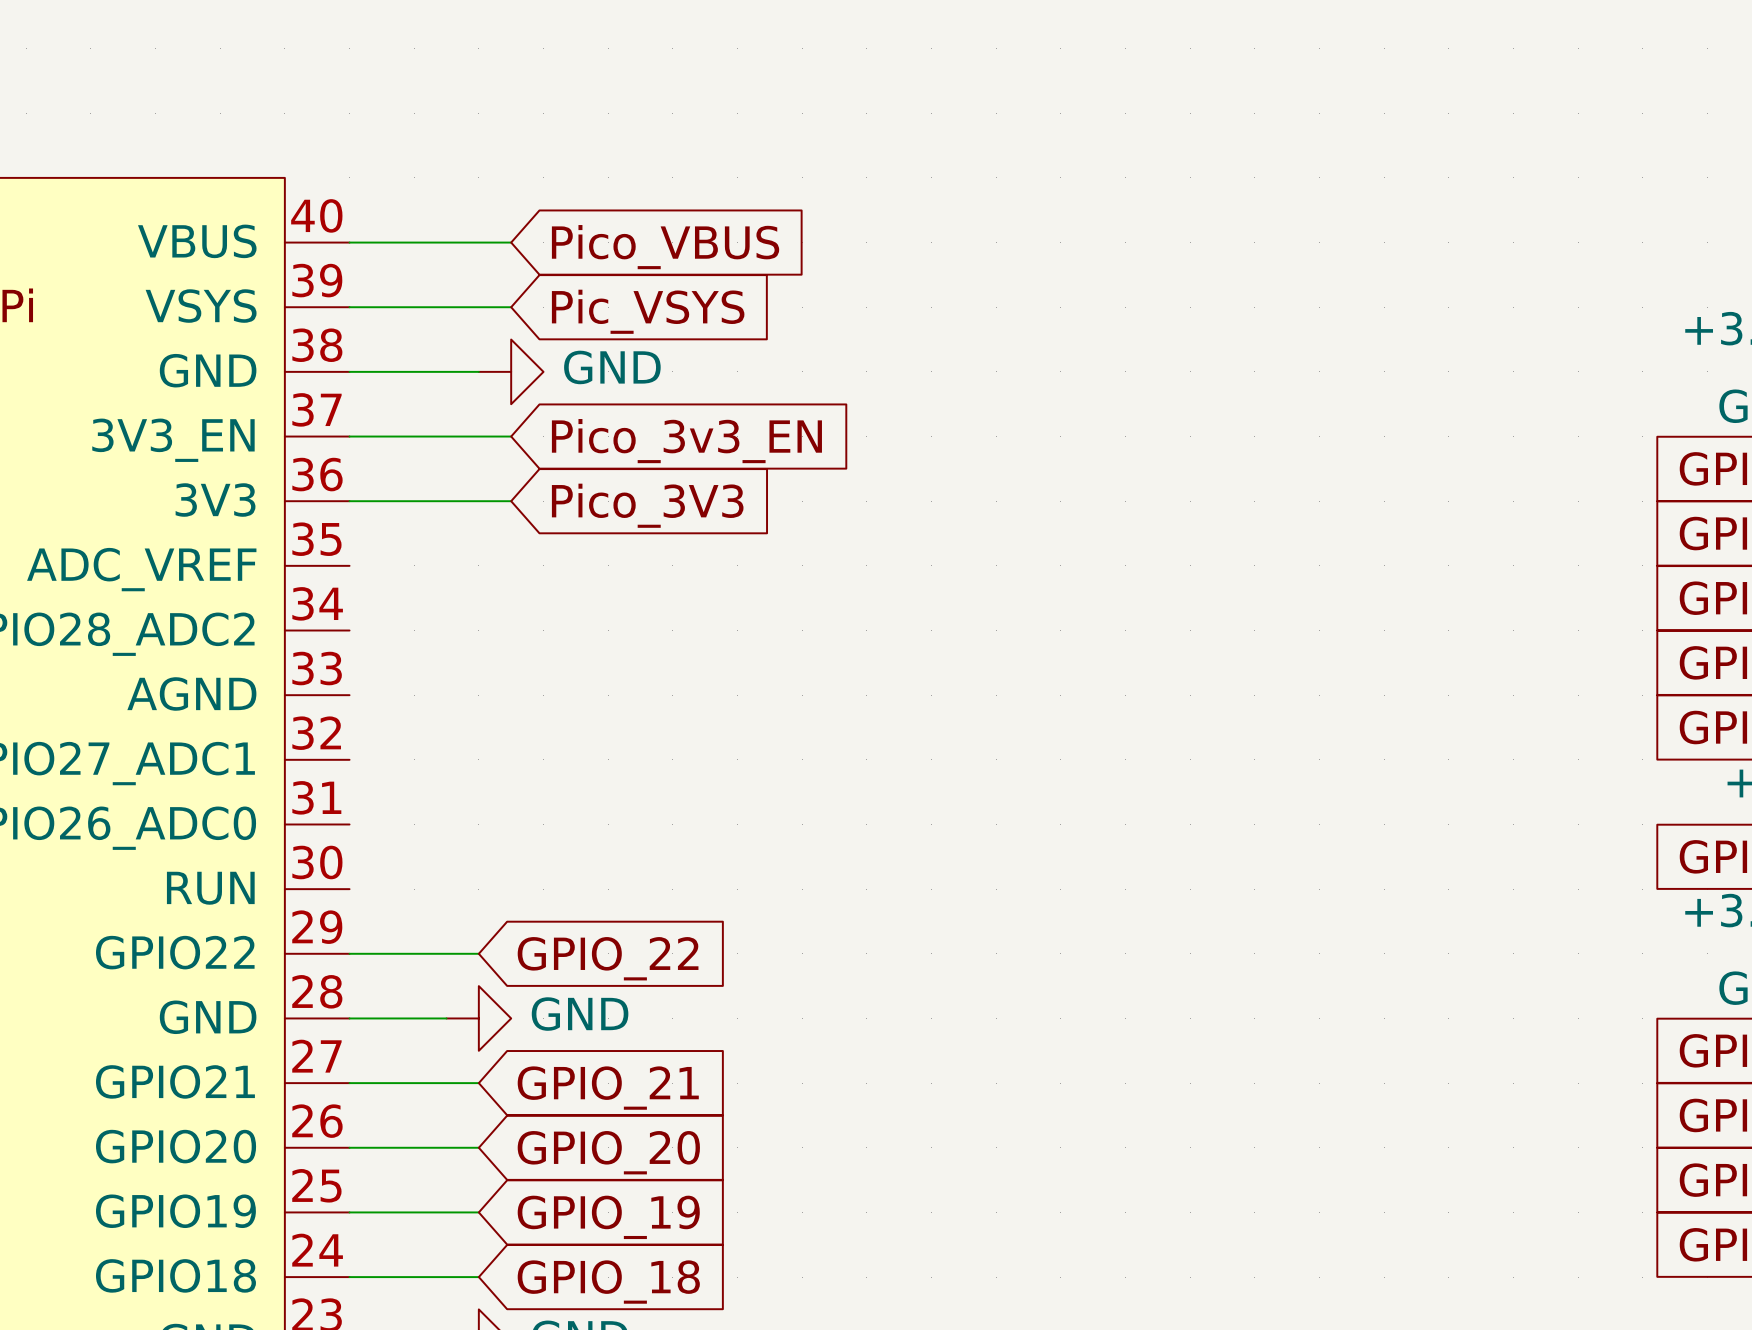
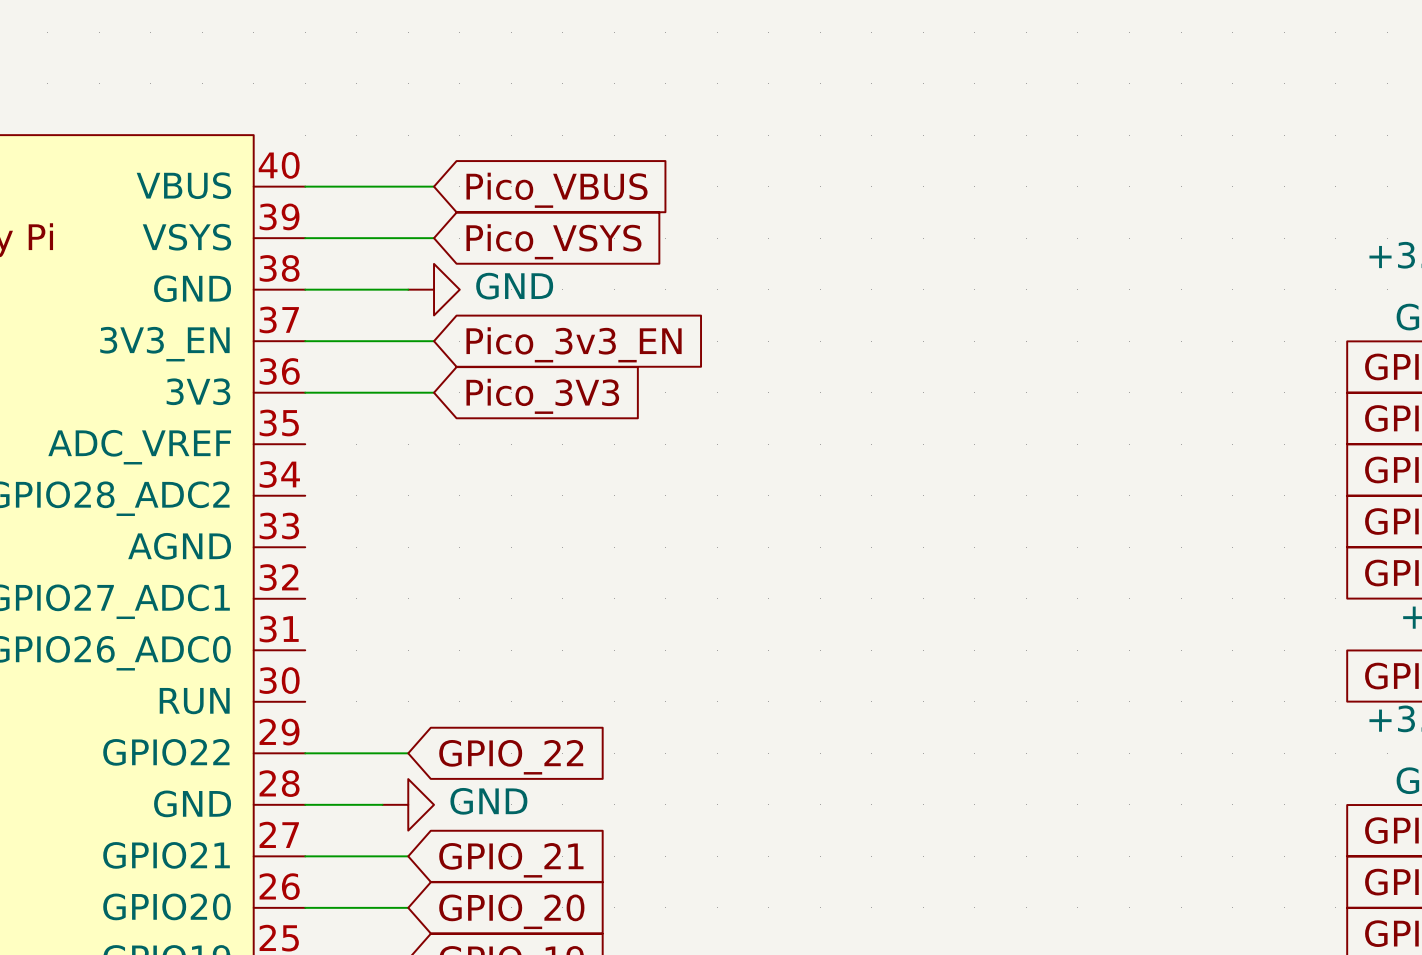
global label: Pic_VSYS (648, 311) -> Pico_VSYS (553, 241)

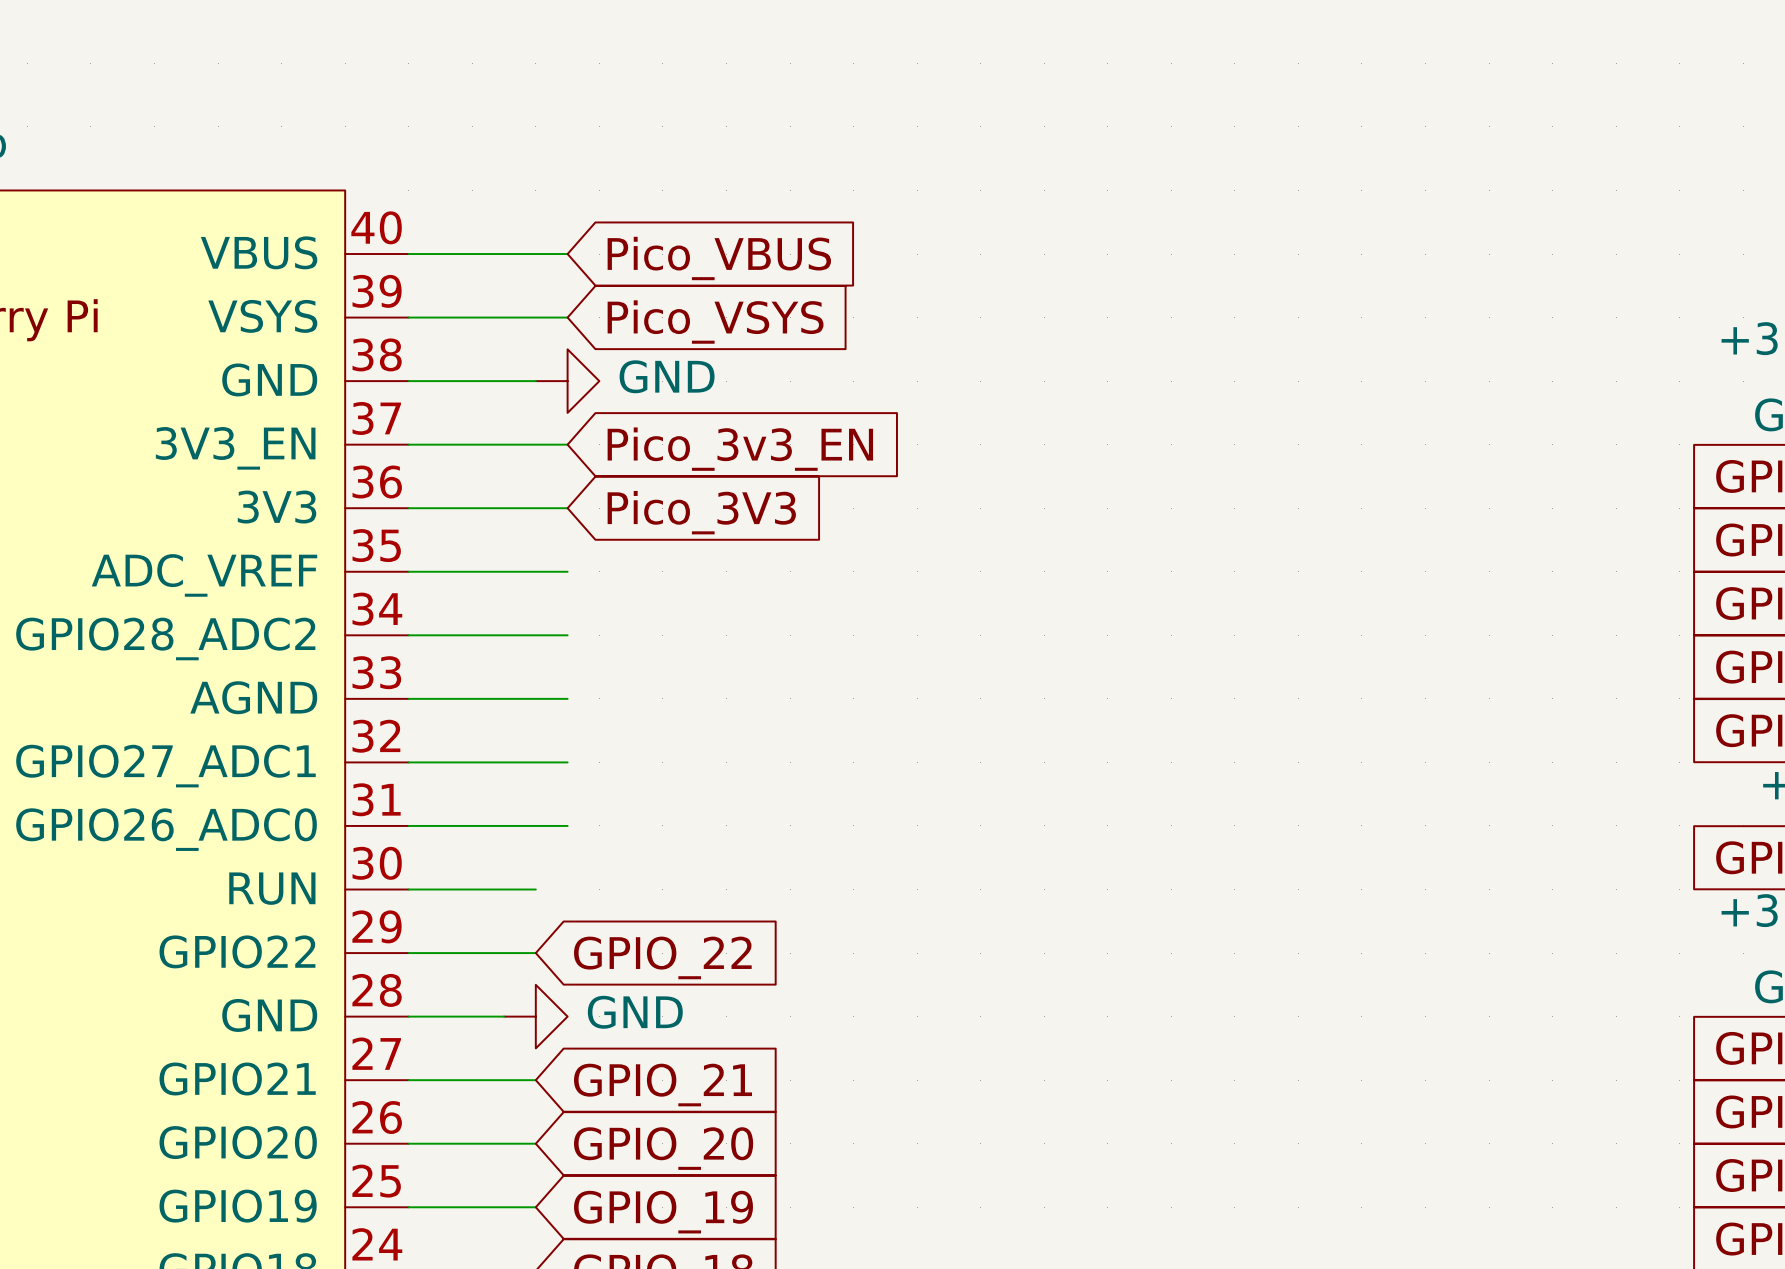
wire: none -> (408, 571) (567, 571)
wire: none -> (408, 635) (567, 635)
wire: none -> (408, 698) (567, 698)
wire: none -> (408, 762) (567, 762)
wire: none -> (408, 825) (567, 825)
wire: none -> (408, 889) (535, 889)

